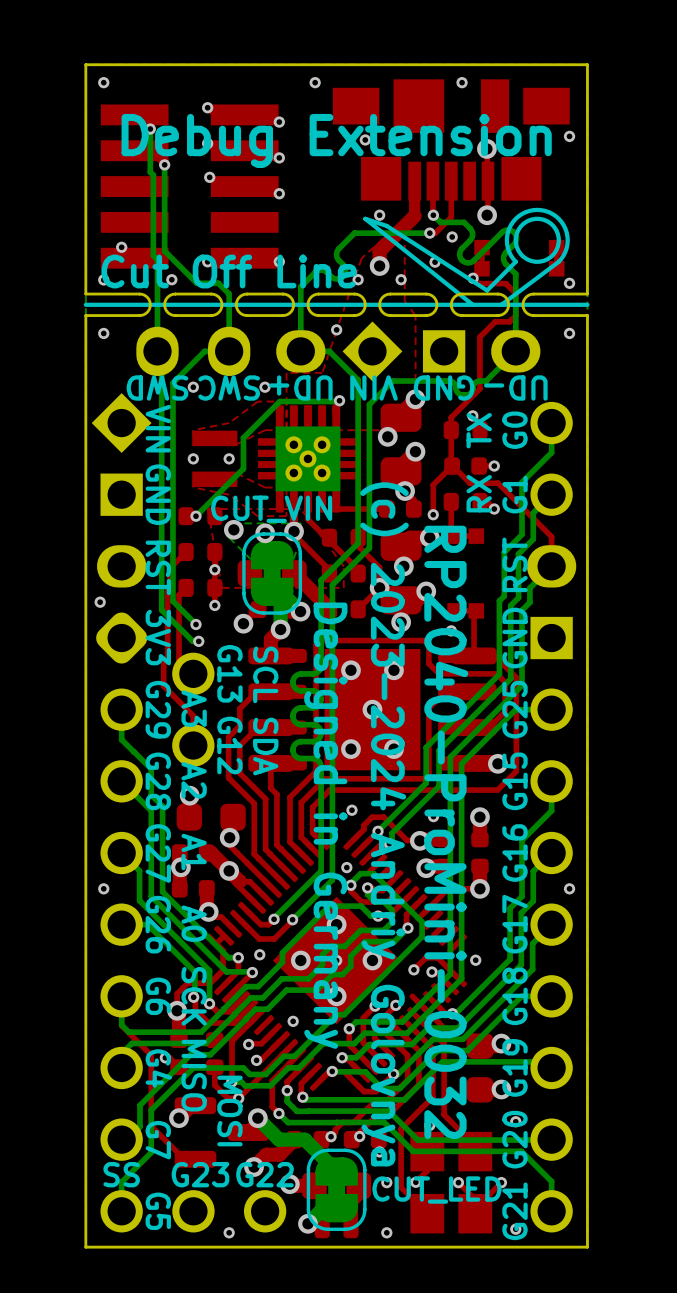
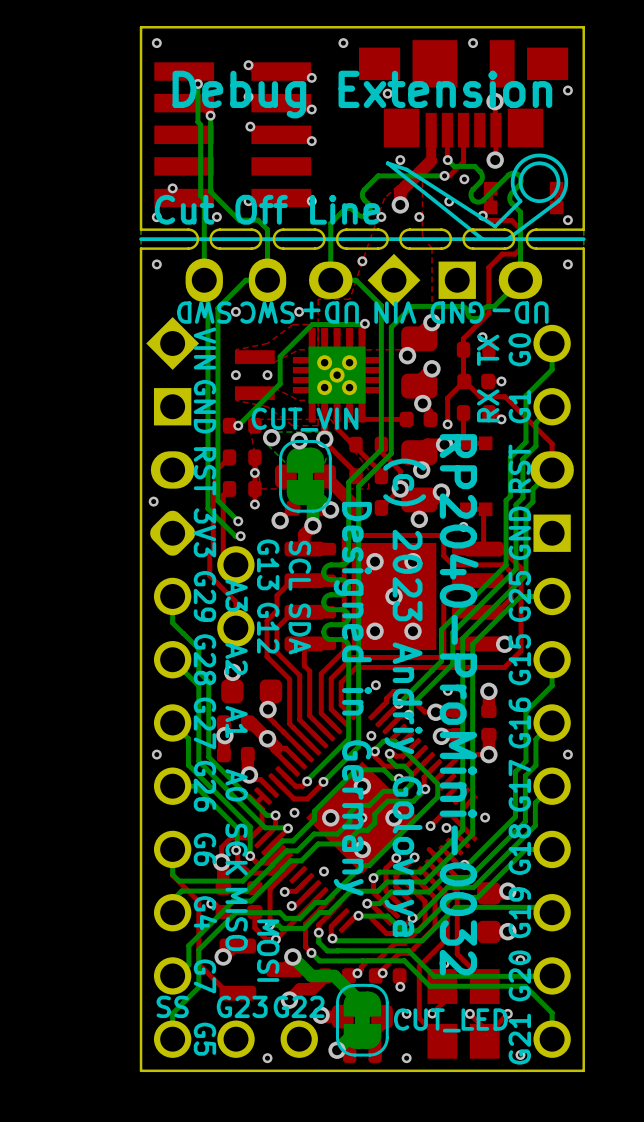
text: (c) 2023-2024 Andriy Golovnya (384, 824) -> (c) 2023 Andriy Golovnya (404, 697)

